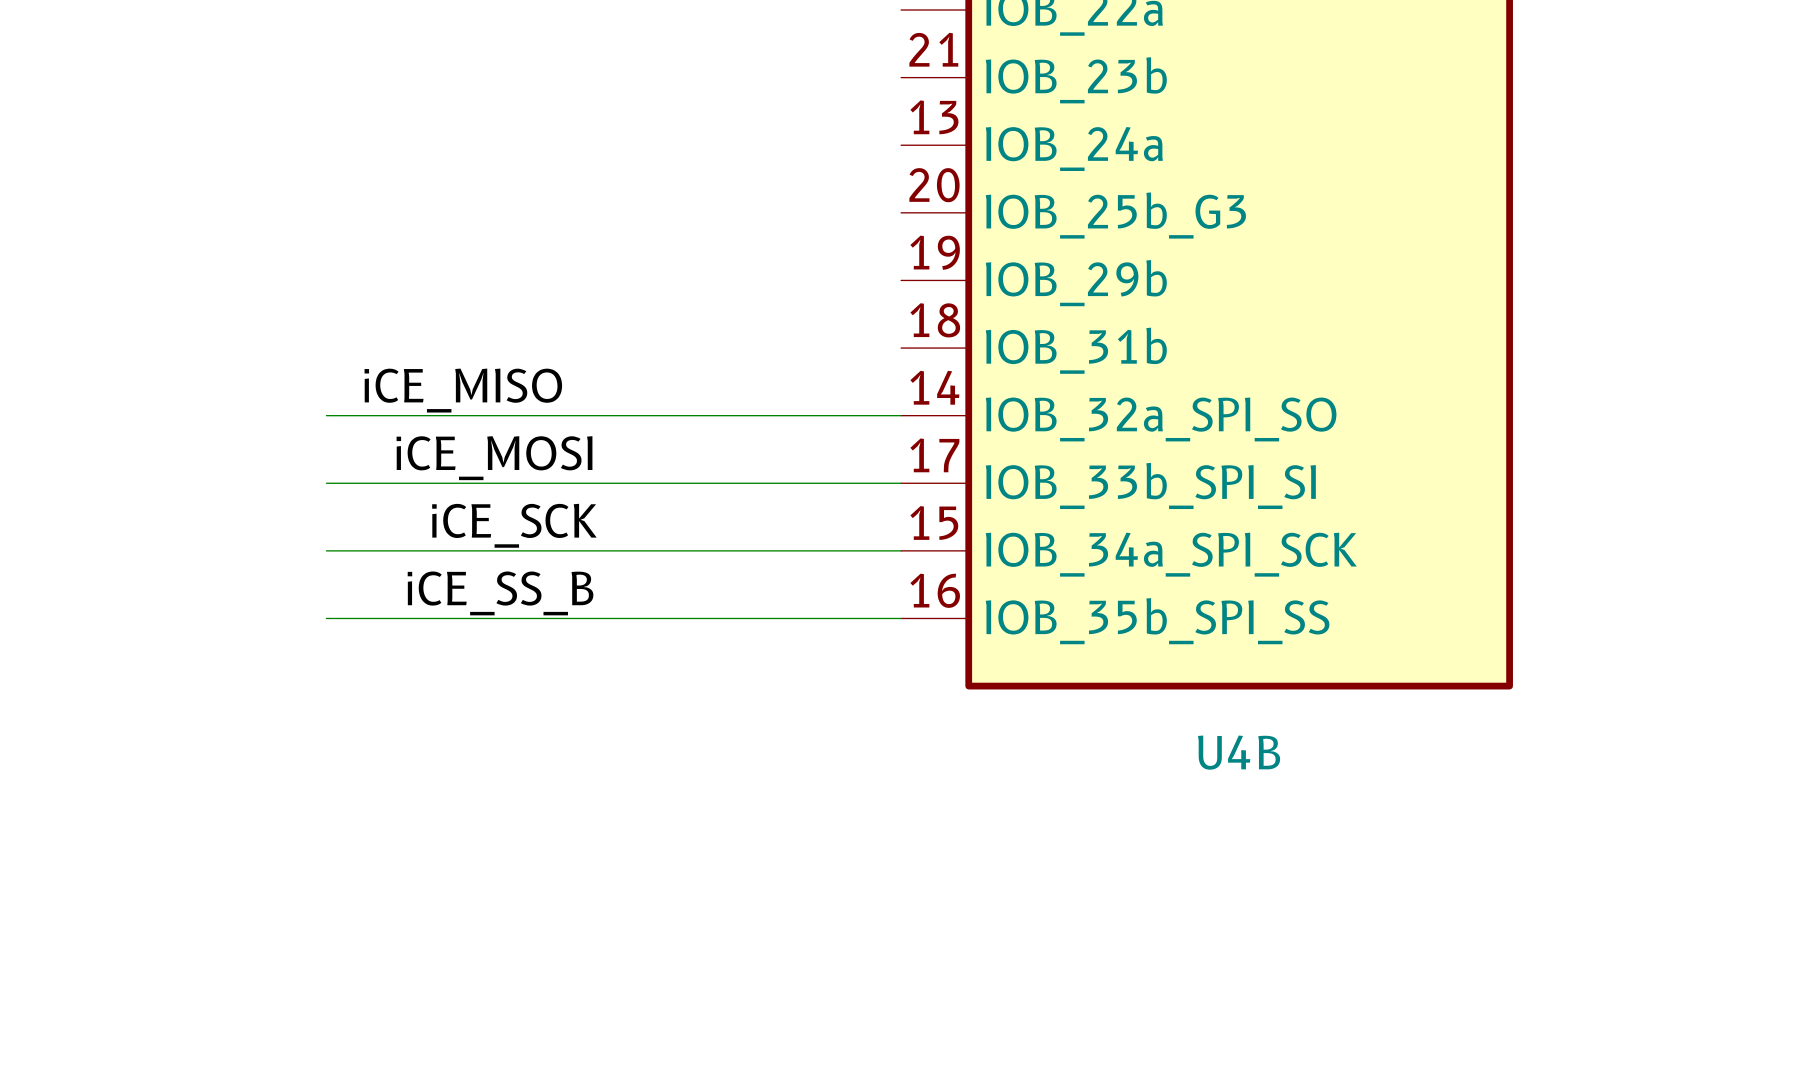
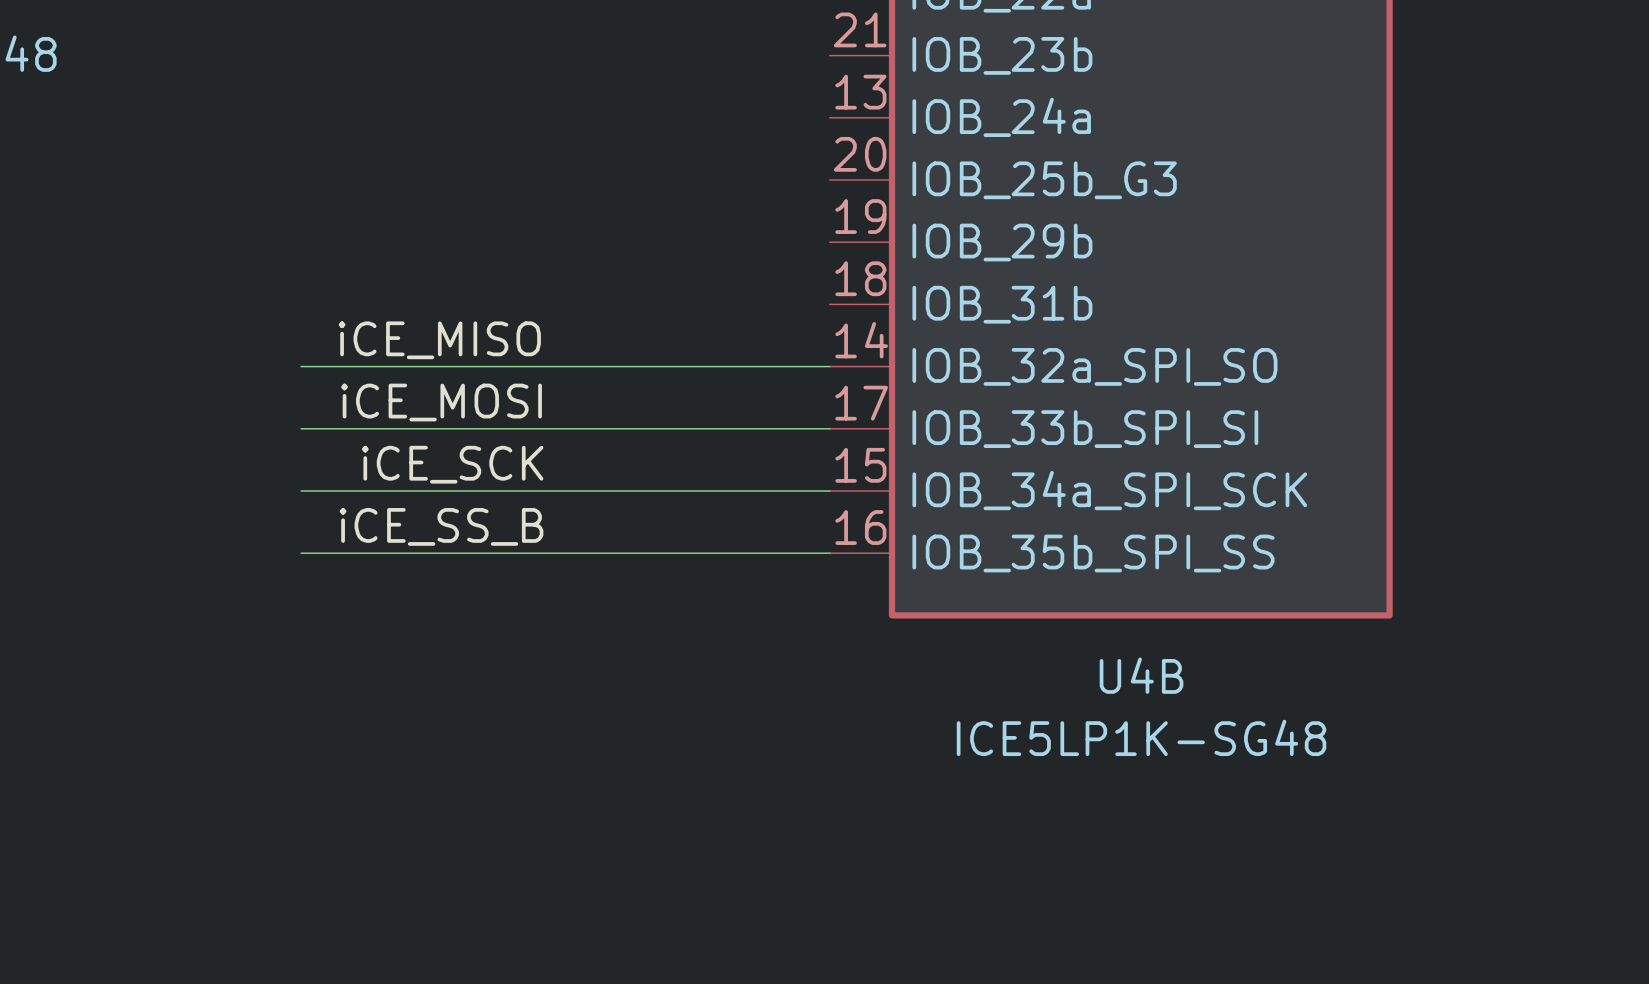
U4B value: none -> ICE5LP1K-SG48 (1141, 737)

